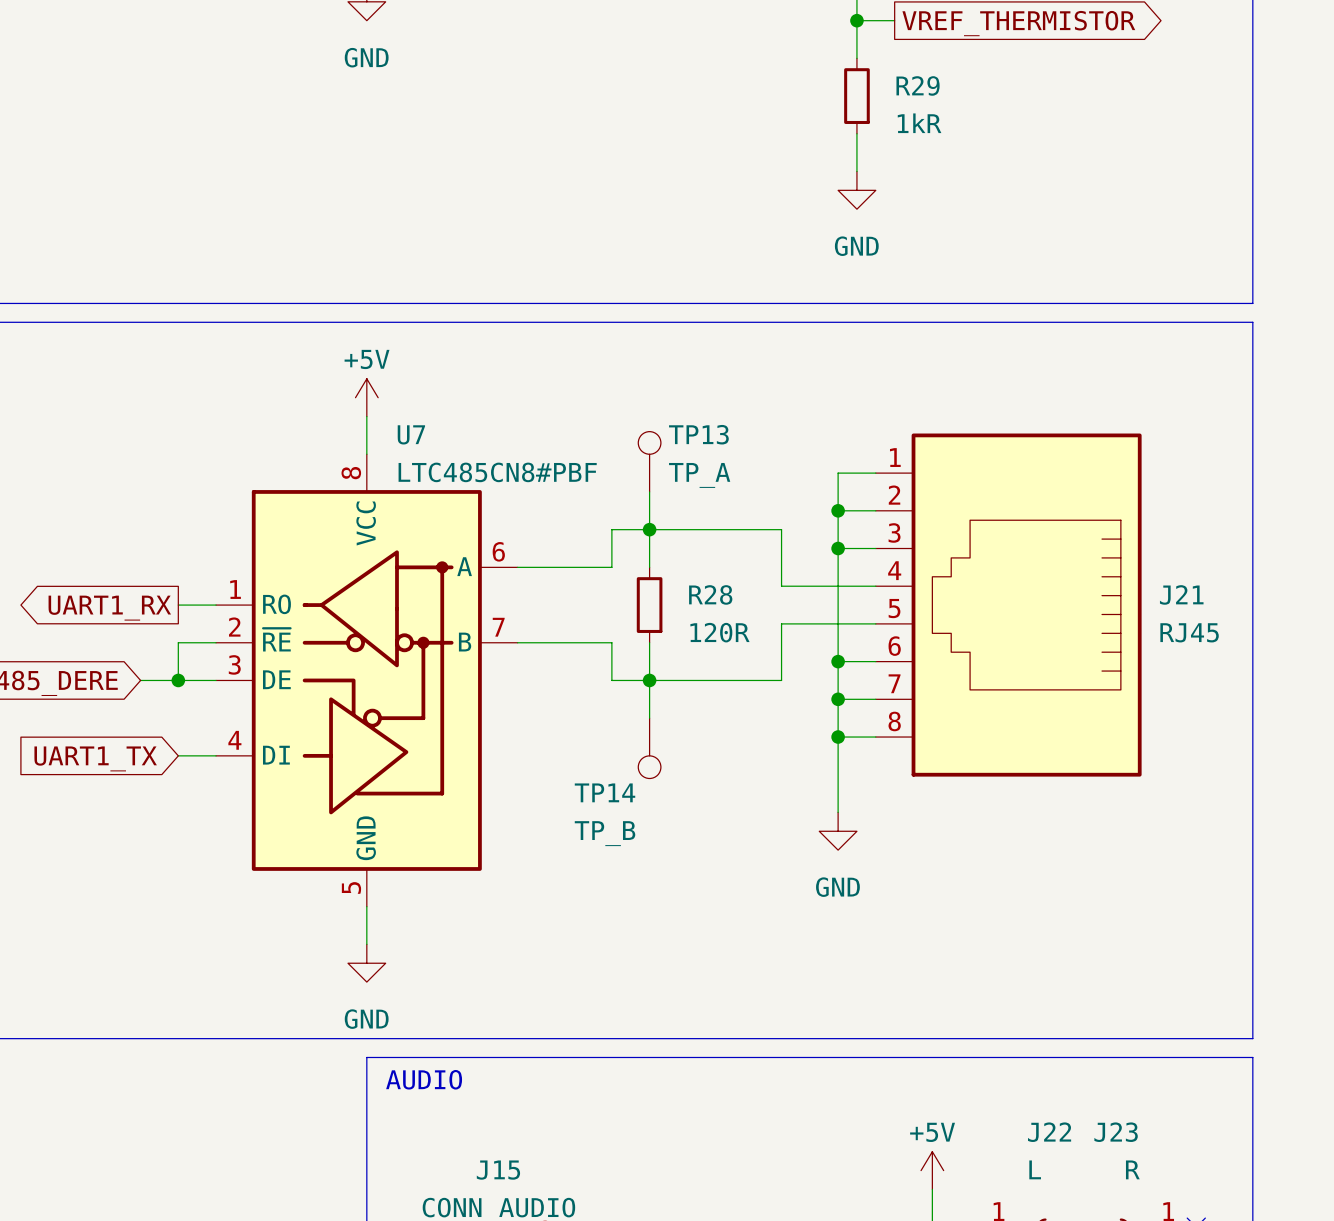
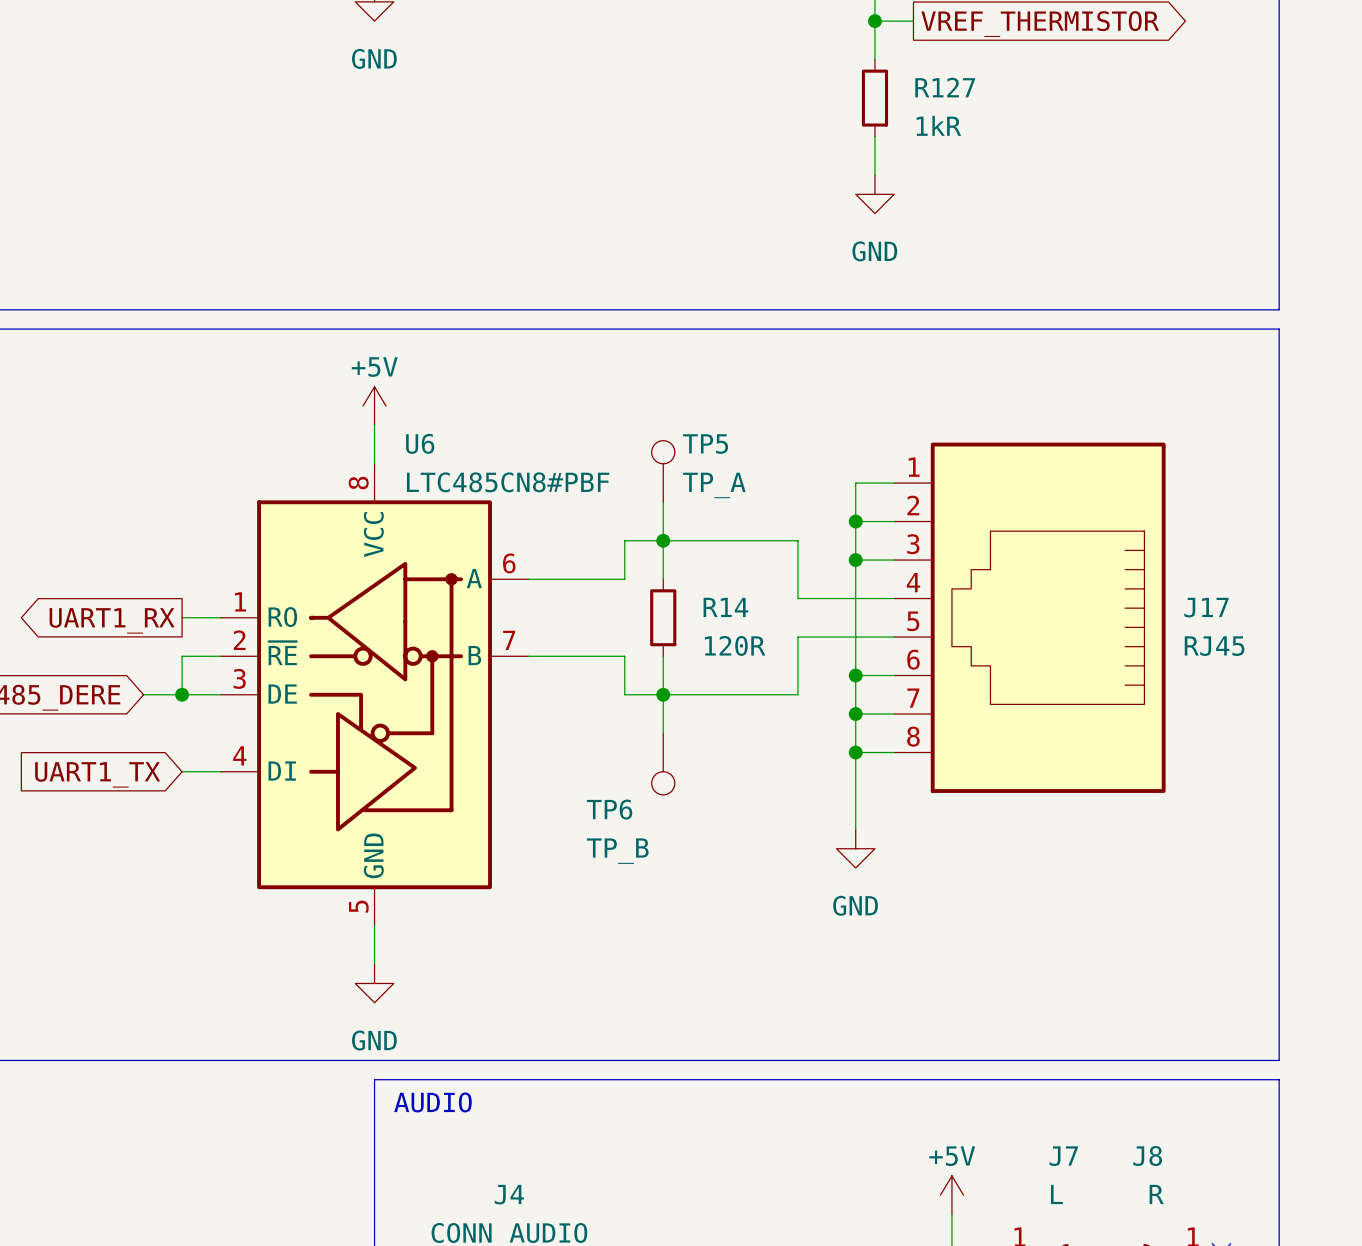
R29 name: R29 (918, 85) -> R127 (945, 87)
U7 name: U7 (411, 434) -> U6 (420, 443)
TP13 name: TP13 (698, 434) -> TP5 (705, 444)
R28 name: R28 (710, 594) -> R14 (725, 607)
J21 name: J21 (1181, 594) -> J17 (1206, 607)
TP14 name: TP14 (605, 792) -> TP6 (609, 809)
J22 name: J22 (1049, 1132) -> J7 (1063, 1156)
J23 name: J23 (1116, 1132) -> J8 (1147, 1155)
J15 name: J15 (498, 1170) -> J4 (509, 1194)

